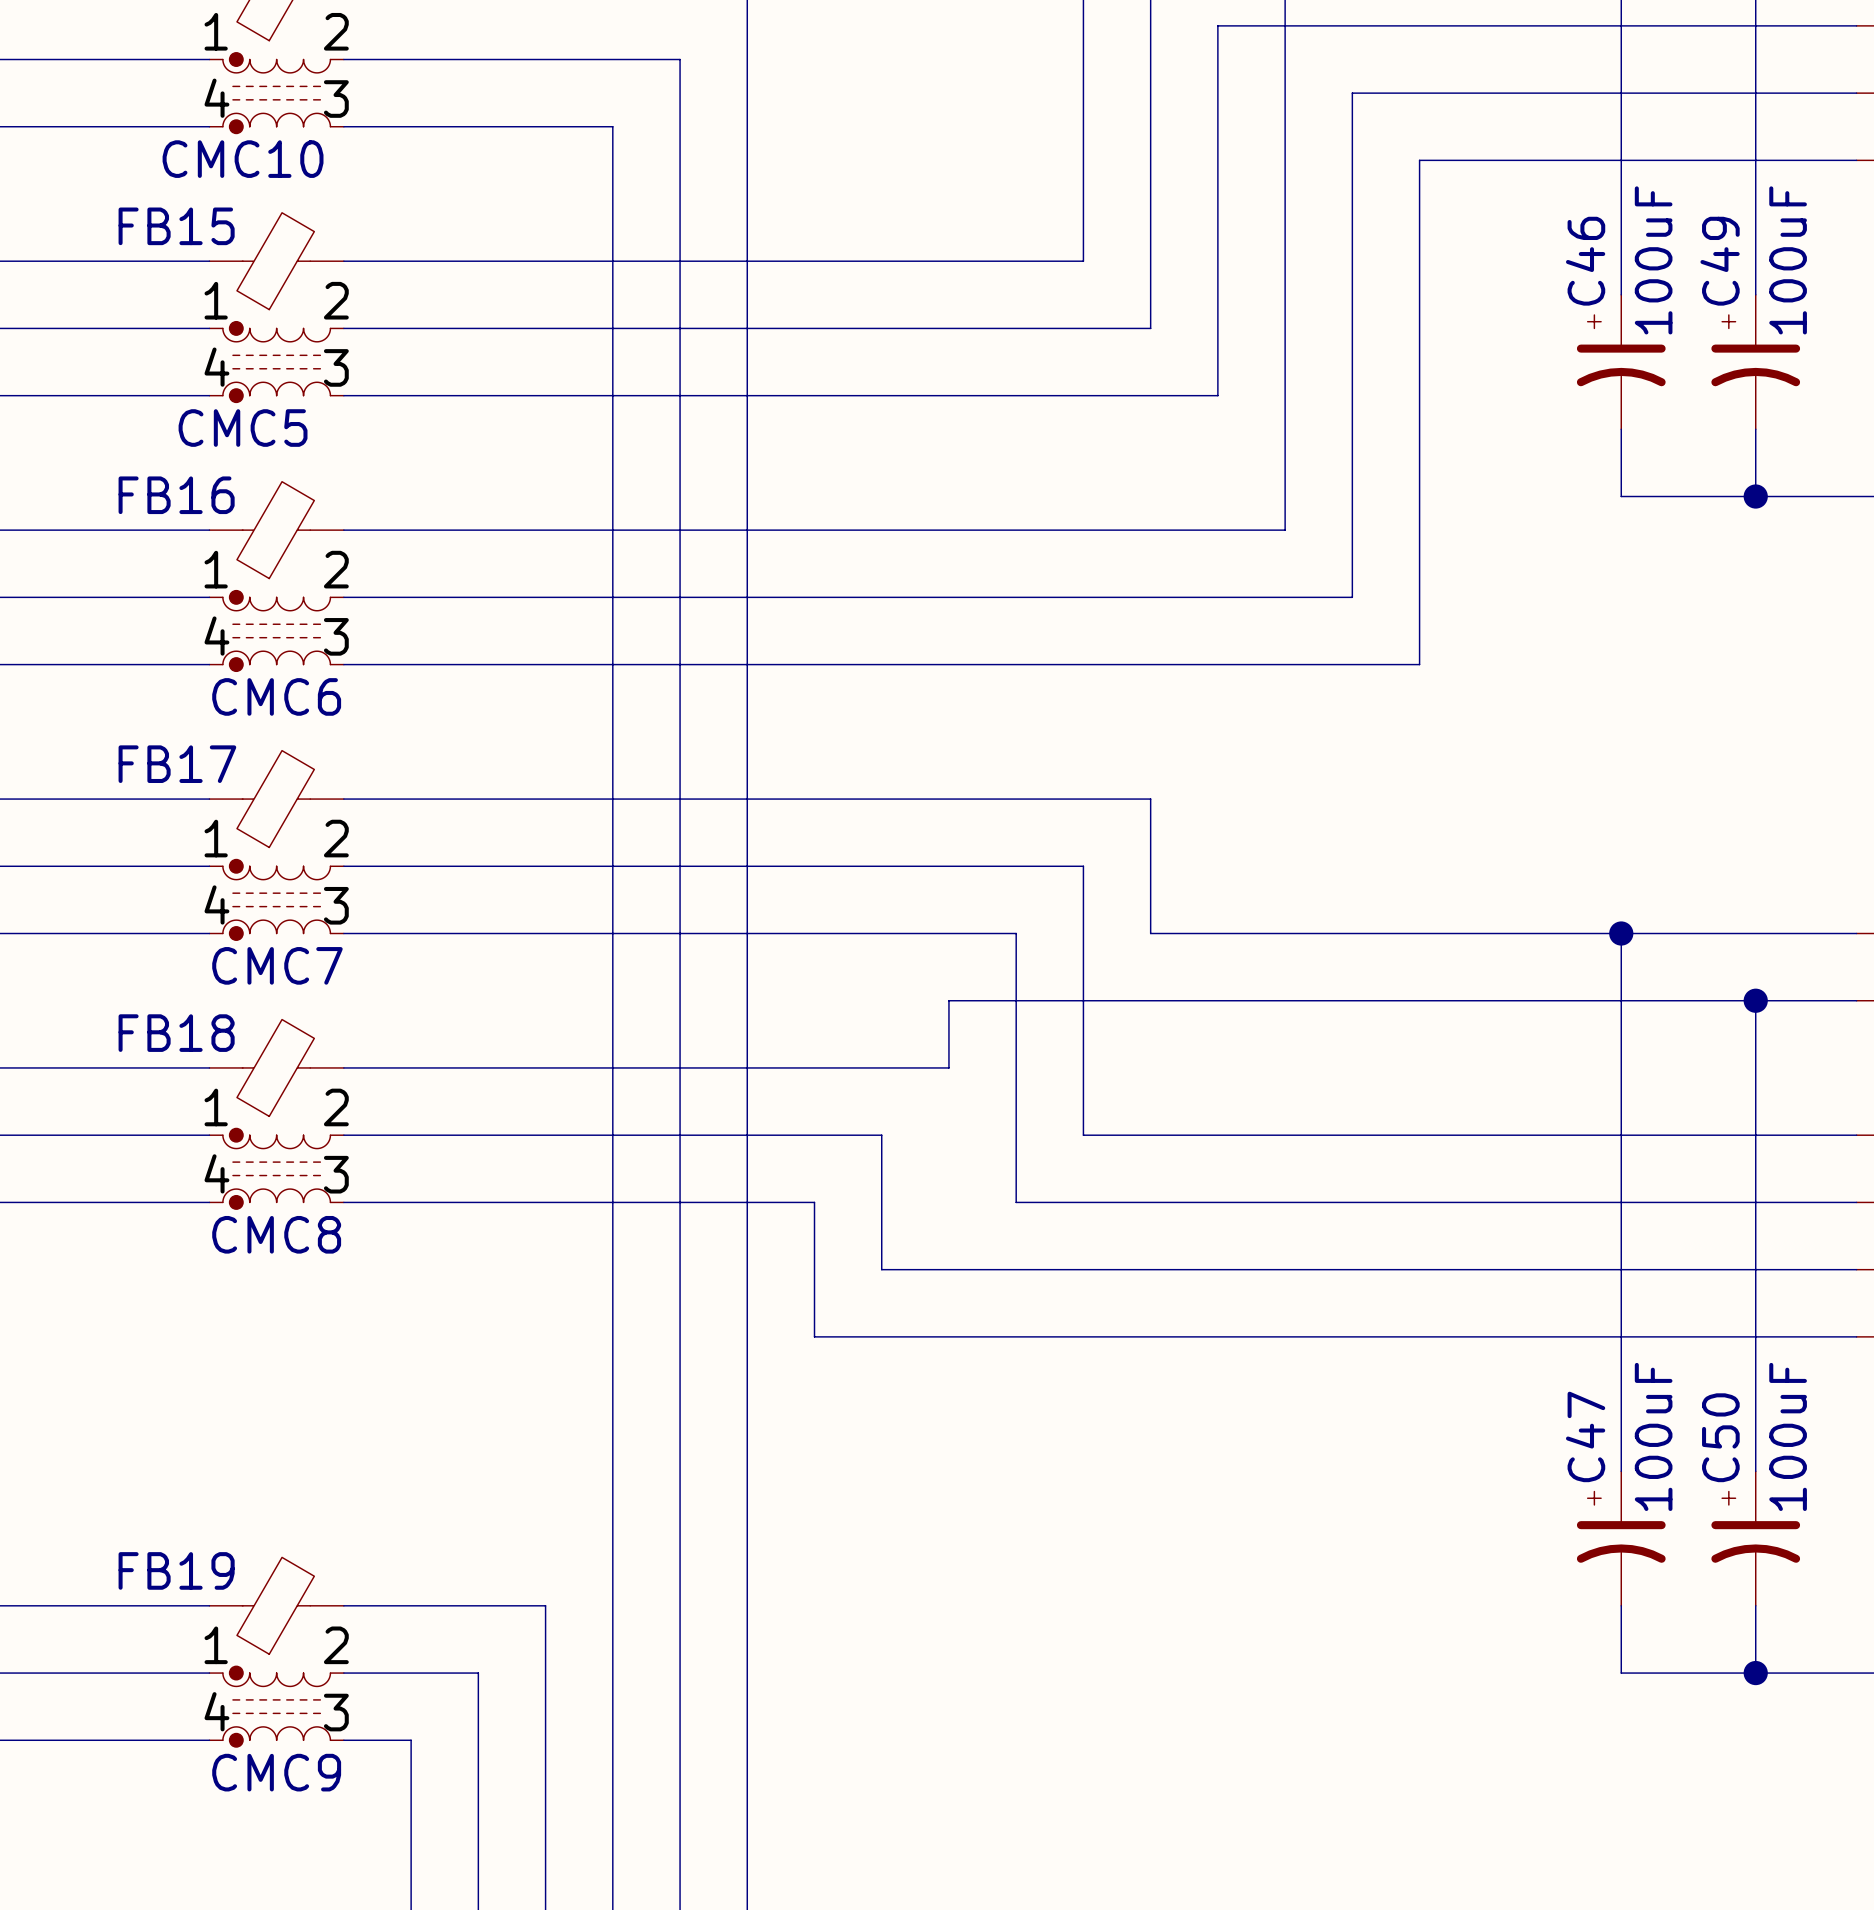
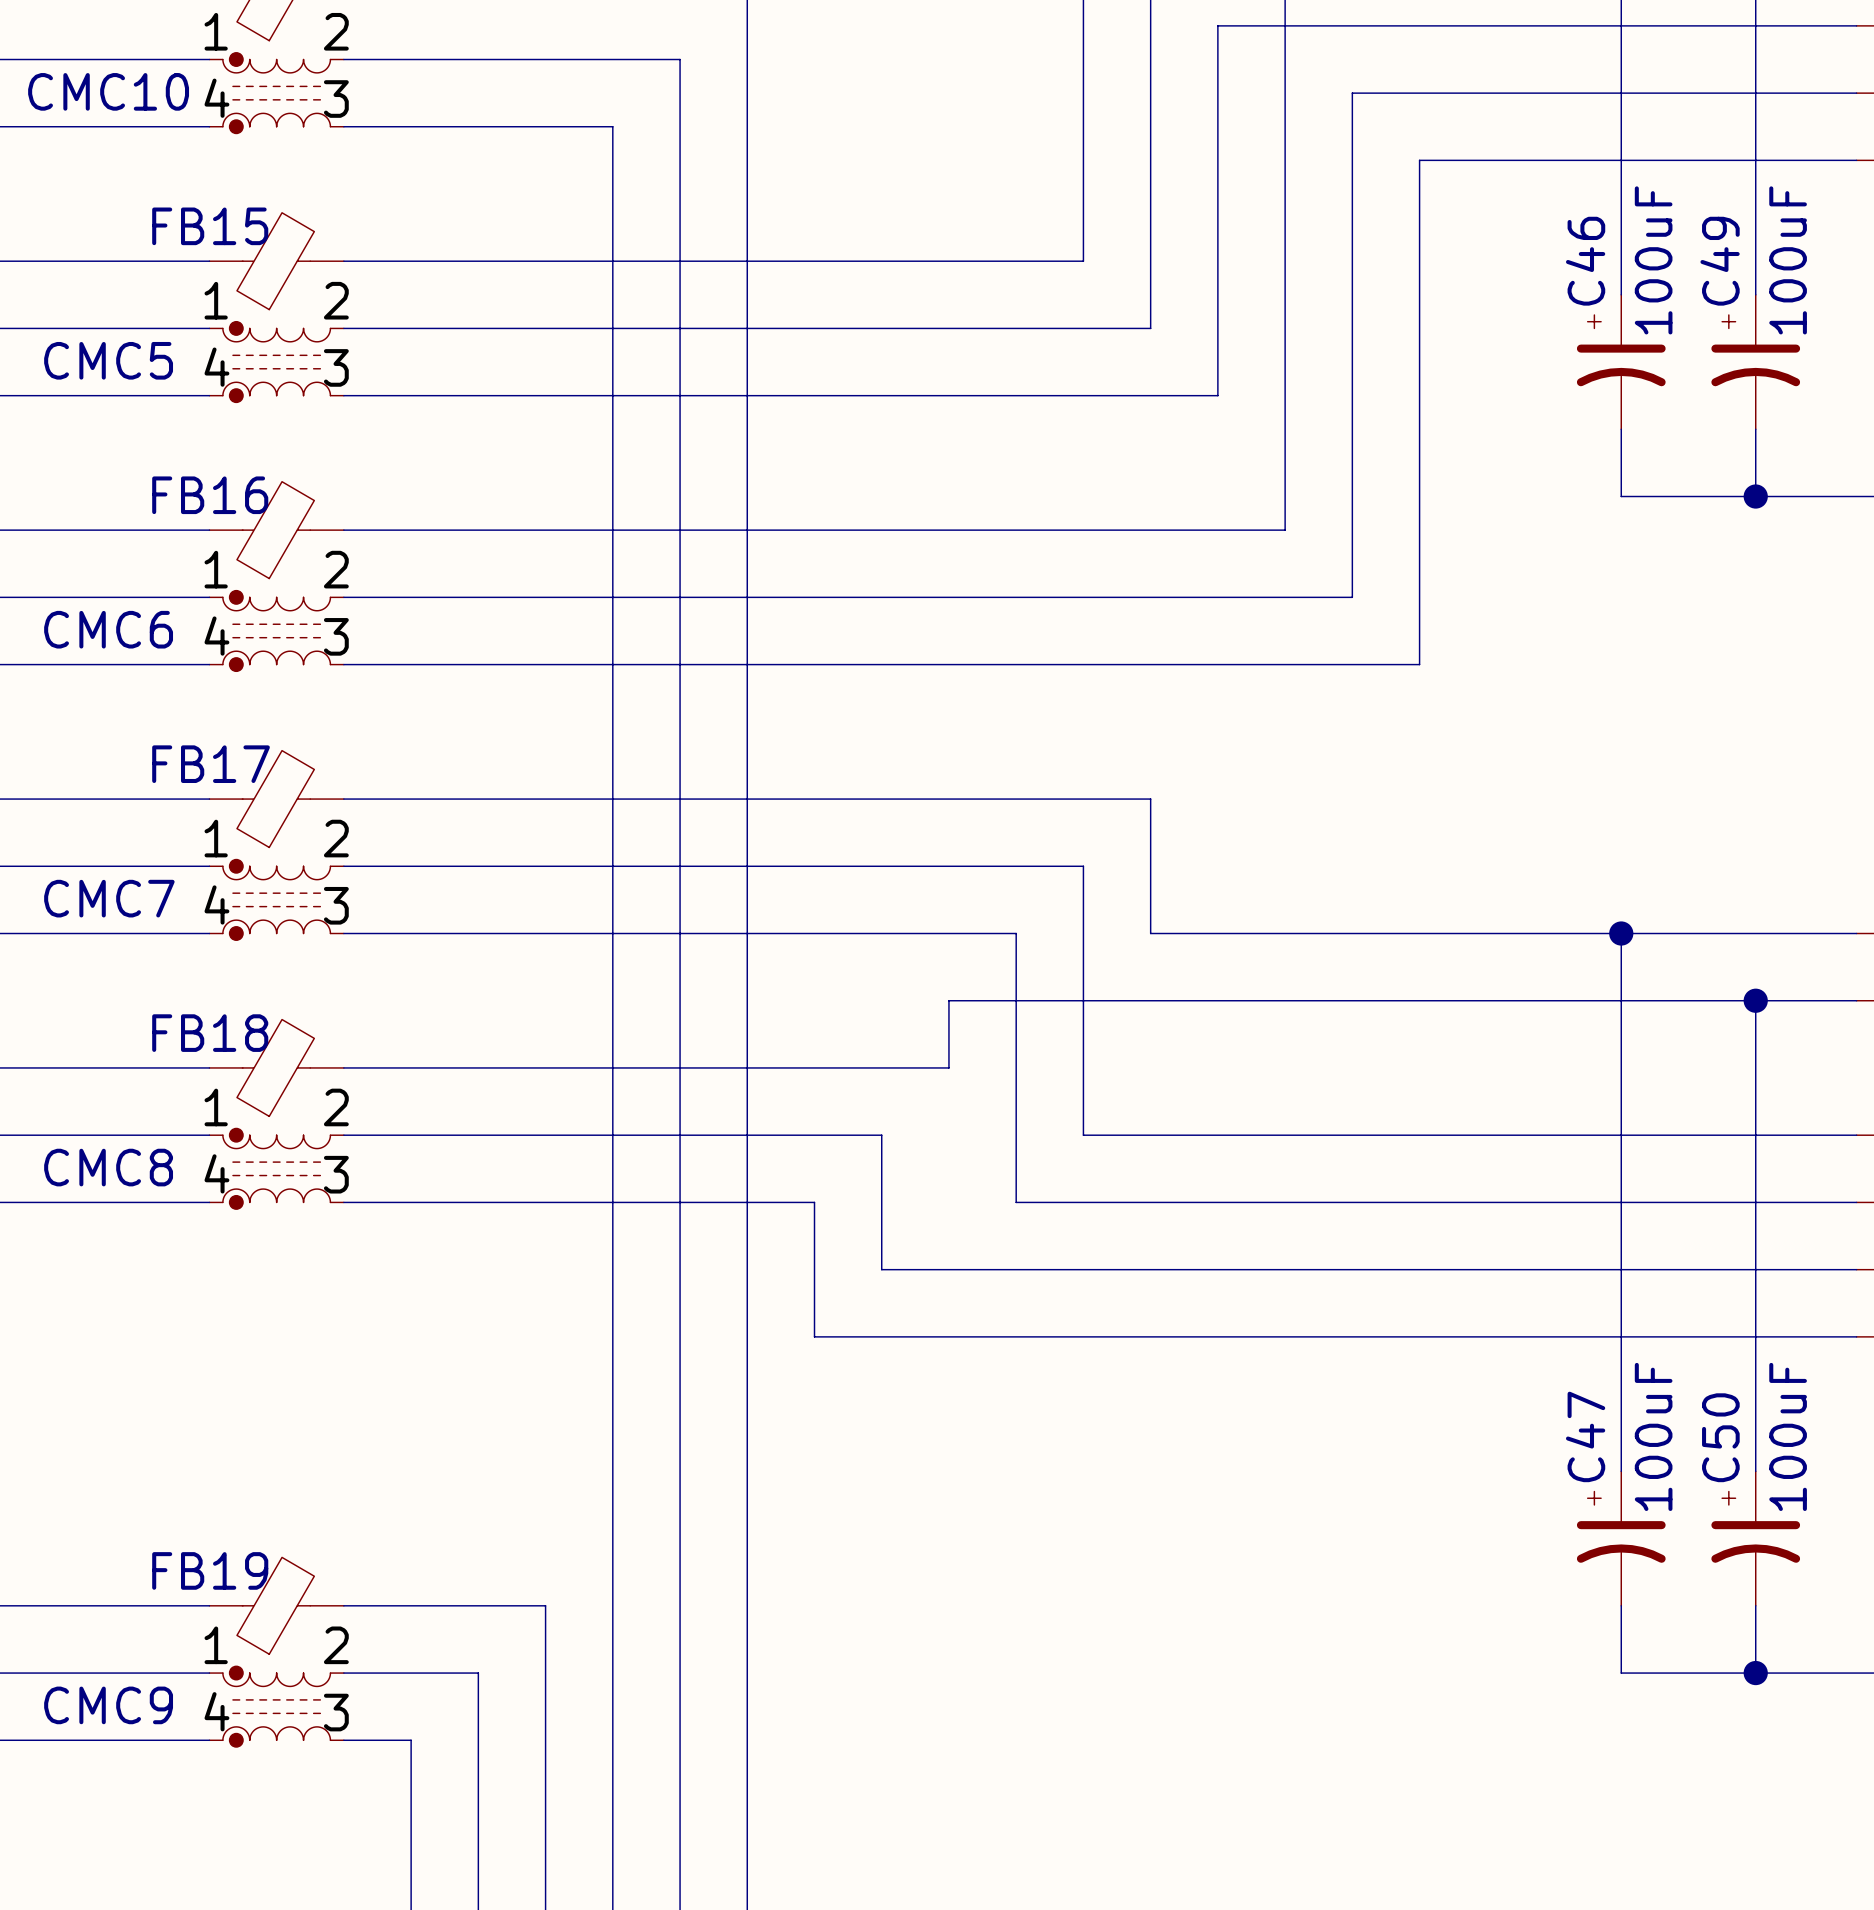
CMC10 name position: CMC10 (243, 159) -> CMC10 (108, 91)
FB15 name position: FB15 (176, 226) -> FB15 (210, 226)
CMC5 name position: CMC5 (243, 428) -> CMC5 (108, 360)
FB16 name position: FB16 (176, 495) -> FB16 (210, 495)
CMC6 name position: CMC6 (276, 696) -> CMC6 (108, 629)
FB17 name position: FB17 (177, 764) -> FB17 (211, 764)
CMC7 name position: CMC7 (277, 965) -> CMC7 (109, 898)
FB18 name position: FB18 (176, 1033) -> FB18 (210, 1033)
CMC8 name position: CMC8 (276, 1234) -> CMC8 (108, 1167)
FB19 name position: FB19 (176, 1570) -> FB19 (210, 1570)
CMC9 name position: CMC9 (276, 1772) -> CMC9 (108, 1705)

